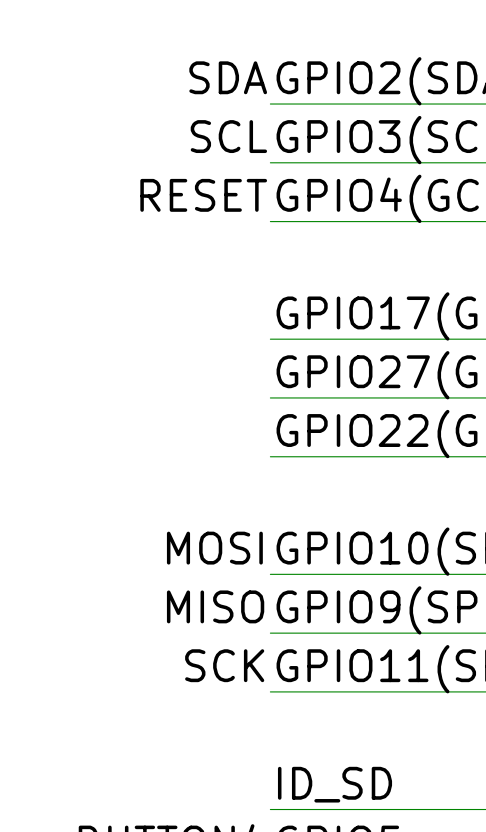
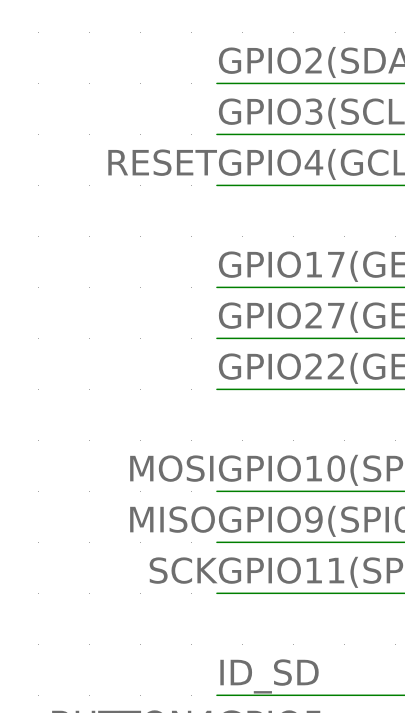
label: SDA (228, 77) -> none
label: SCL (228, 136) -> none

